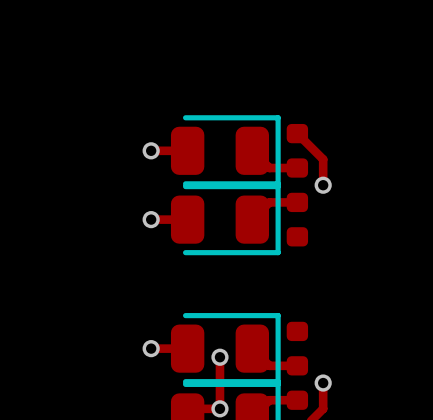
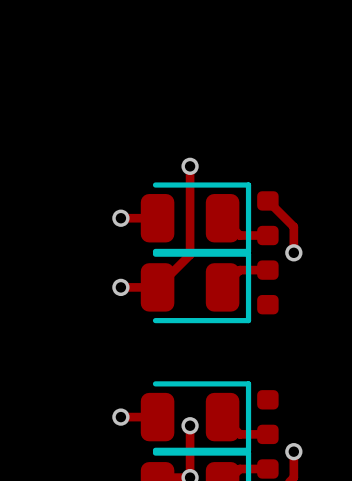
track: none -> (190, 166) (190, 254) (157, 287)
via: none -> (190, 166)

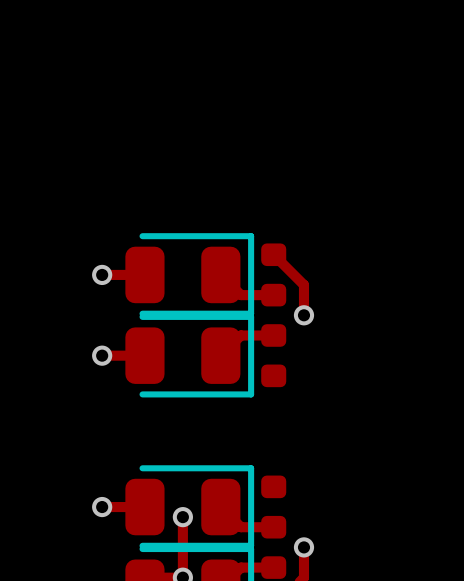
track: (190, 166) (190, 254) (157, 287) -> none
via: (190, 166) -> none

